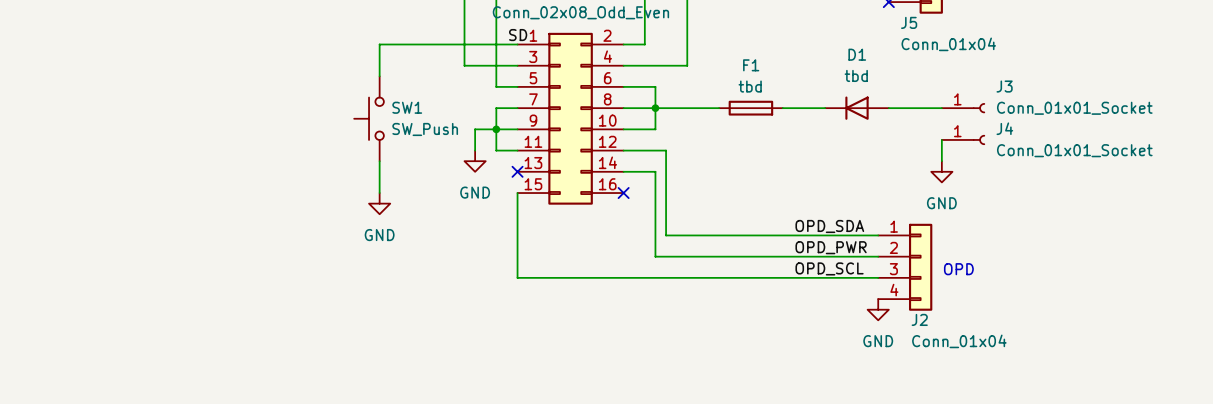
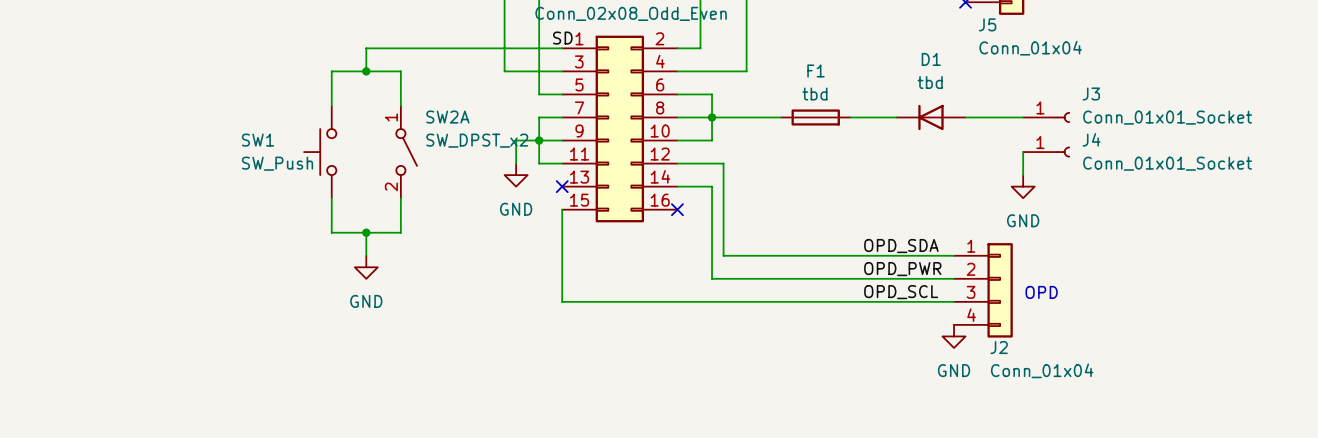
wire: (379, 44) (379, 76) -> (412, 48) (366, 48) (366, 71)
junction: none -> (366, 71)
wire: none -> (331, 105) (331, 71) (400, 71) (400, 105)
SW1 name position: SW1 (407, 107) -> SW1 (258, 140)
SW1 position: (369, 118) -> (320, 152)
SW1 value position: SW_Push (425, 129) -> SW_Push (277, 163)
SW2A: none -> SW_DPST_x2 (406, 152)
wire: (379, 161) (379, 193) -> none
wire: none -> (331, 198) (331, 232) (400, 232) (400, 198)
power symbol position: GND (379, 203) -> GND (366, 267)
wire: none -> (366, 232) (366, 255)
junction: none -> (366, 232)

